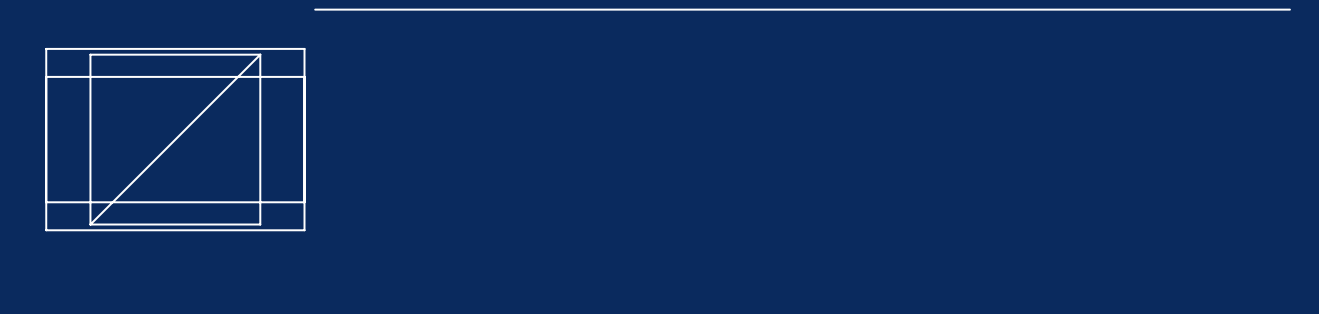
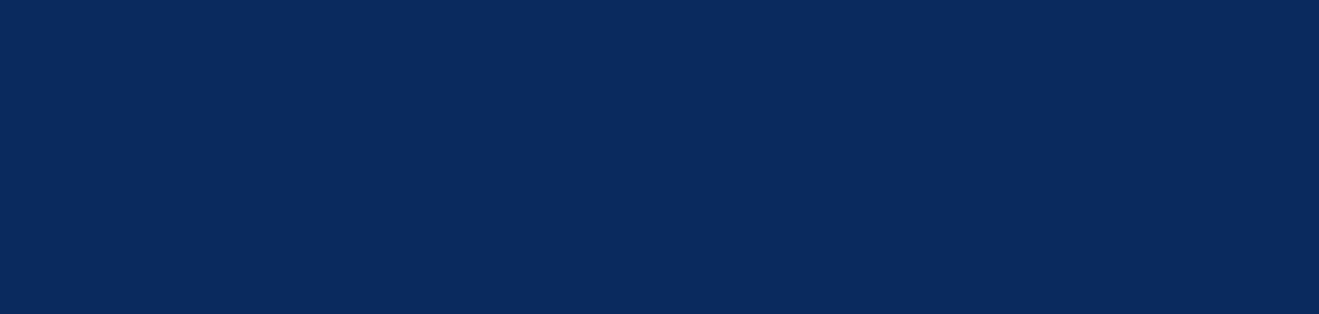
line: (315, 9) (1289, 9) -> none
line: (46, 48) (46, 230) (304, 230) (304, 48) (46, 48) -> none
line: (260, 54) (90, 54) (90, 224) -> none
line: (260, 54) (260, 224) (90, 224) -> none
line: (260, 54) (90, 224) -> none
line: (46, 76) (304, 76) -> none
line: (46, 202) (304, 202) -> none

